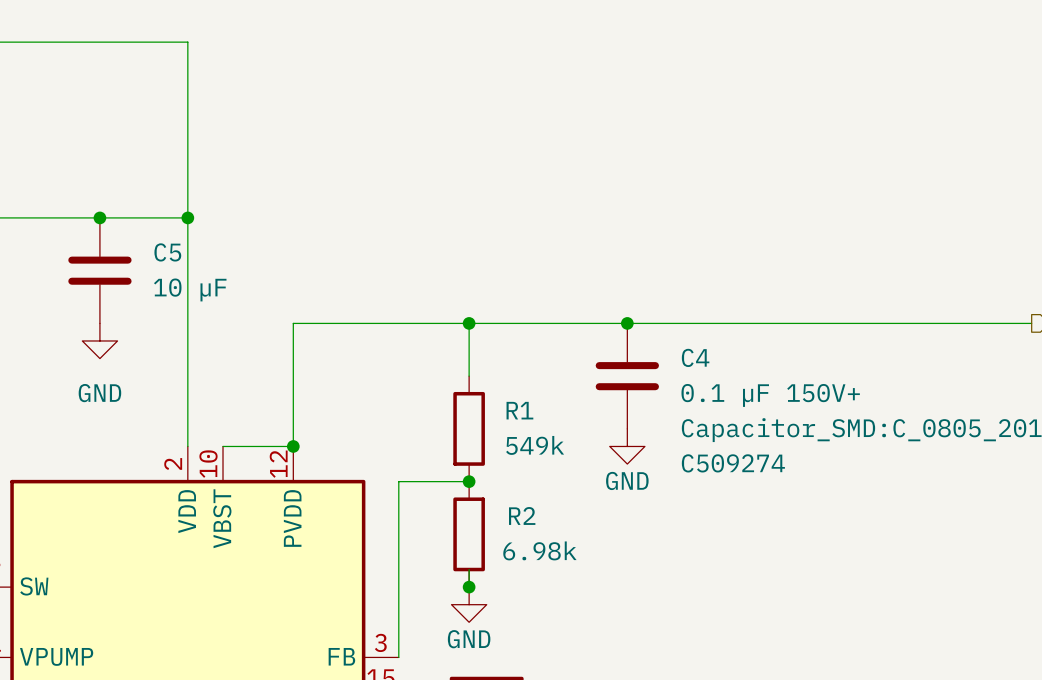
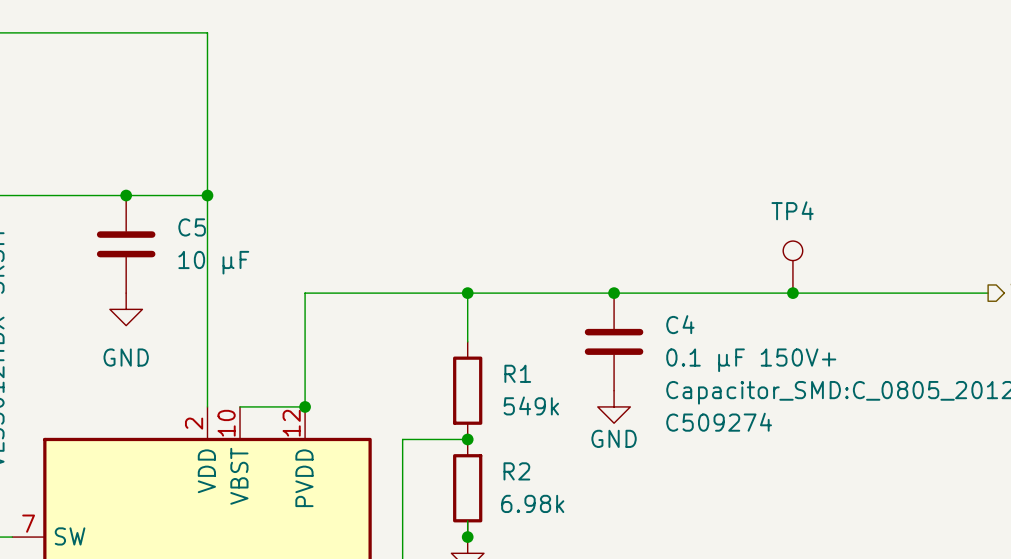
TP4: none -> (792, 267)
junction: none -> (792, 293)

